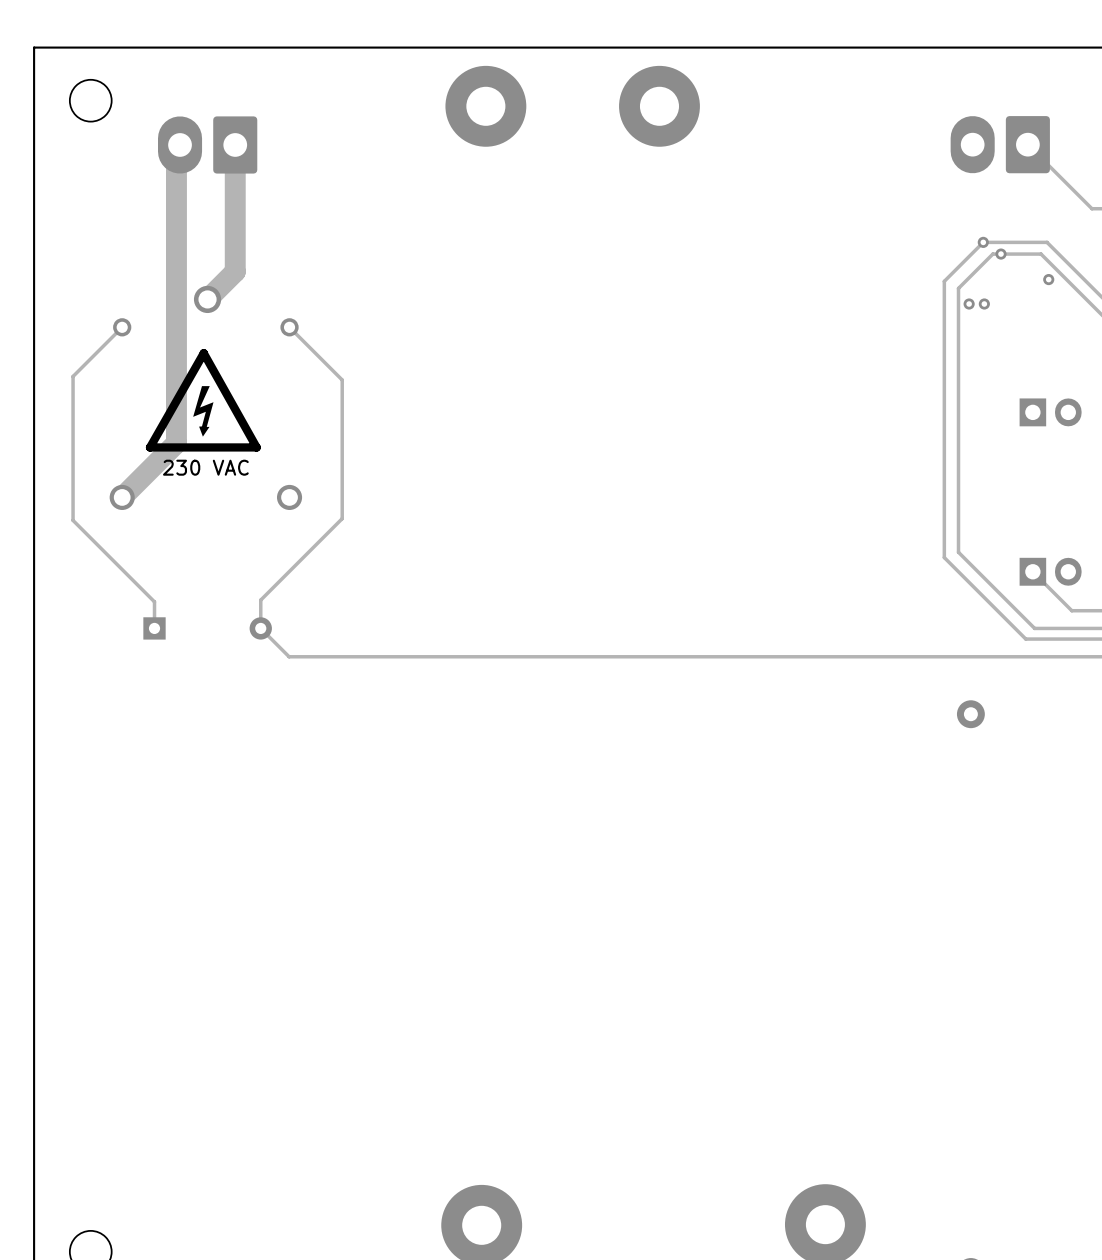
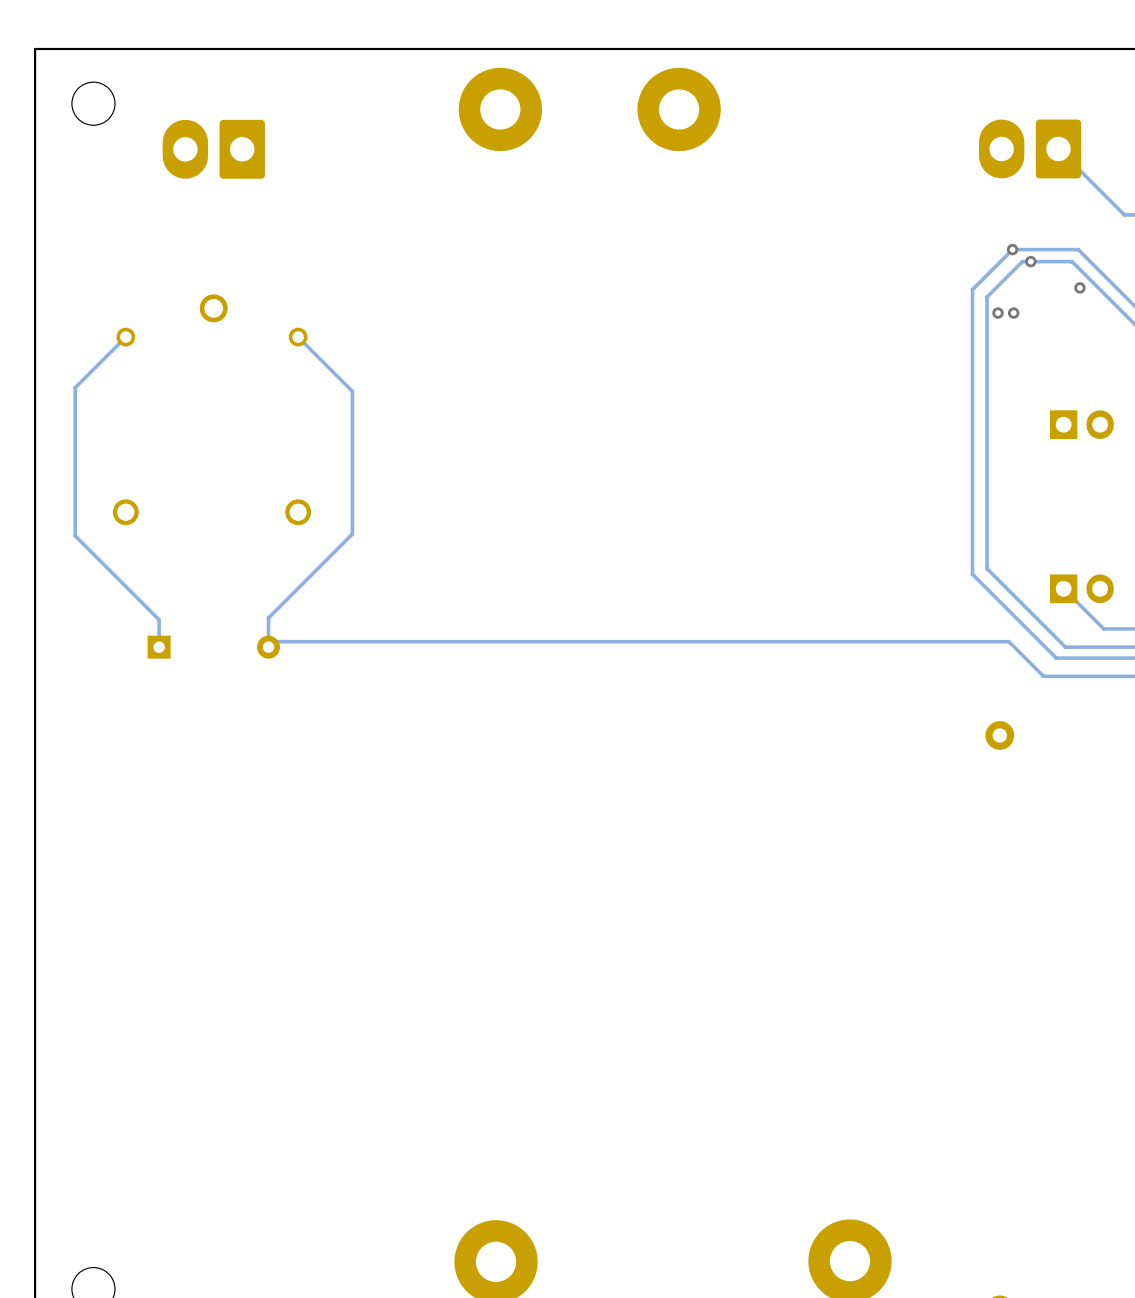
track: (180, 144) (176, 148) (176, 443) (122, 497) -> none
track: (235, 144) (235, 271) (207, 299) -> none
drawing: [145, 349, 261, 452] -> none
text: 230 VAC (205, 467) -> none
track: (260, 628) (289, 656) (1013, 656) -> (274, 641) (1008, 641) (1043, 676)

